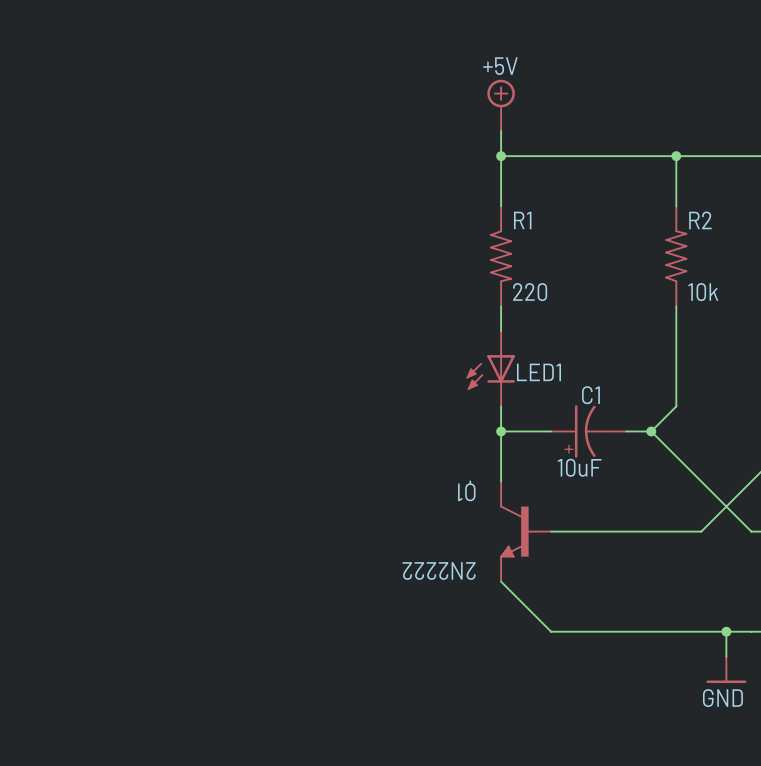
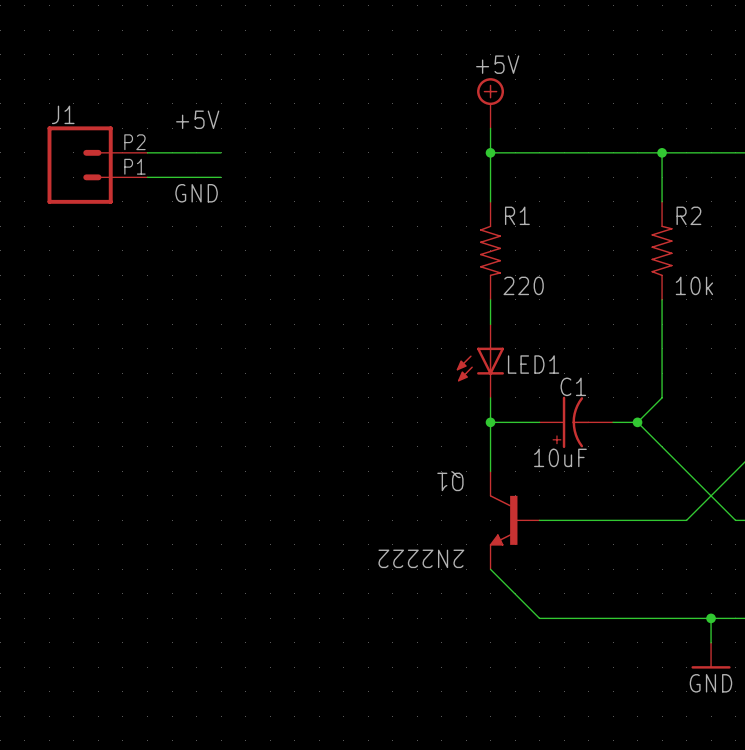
label: none -> +5V (197, 119)
wire: none -> (147, 152) (221, 152)
J1: none -> (97, 165)
wire: none -> (147, 177) (221, 177)
label: none -> GND (196, 193)

